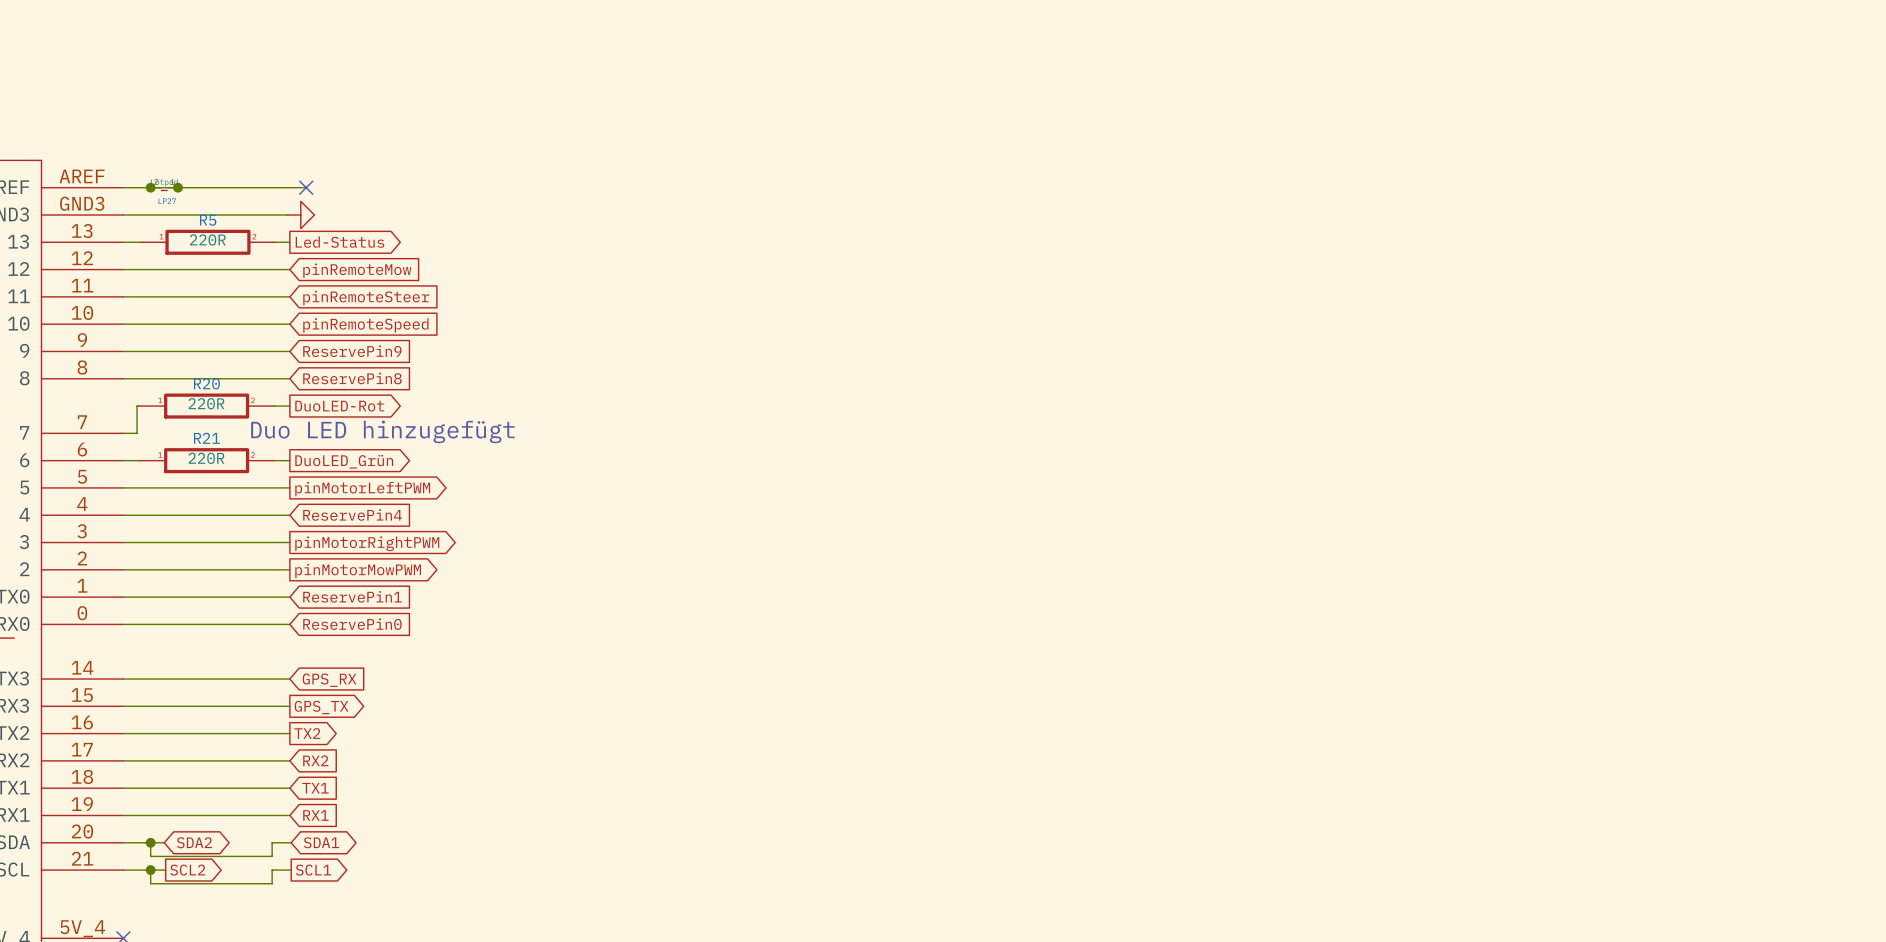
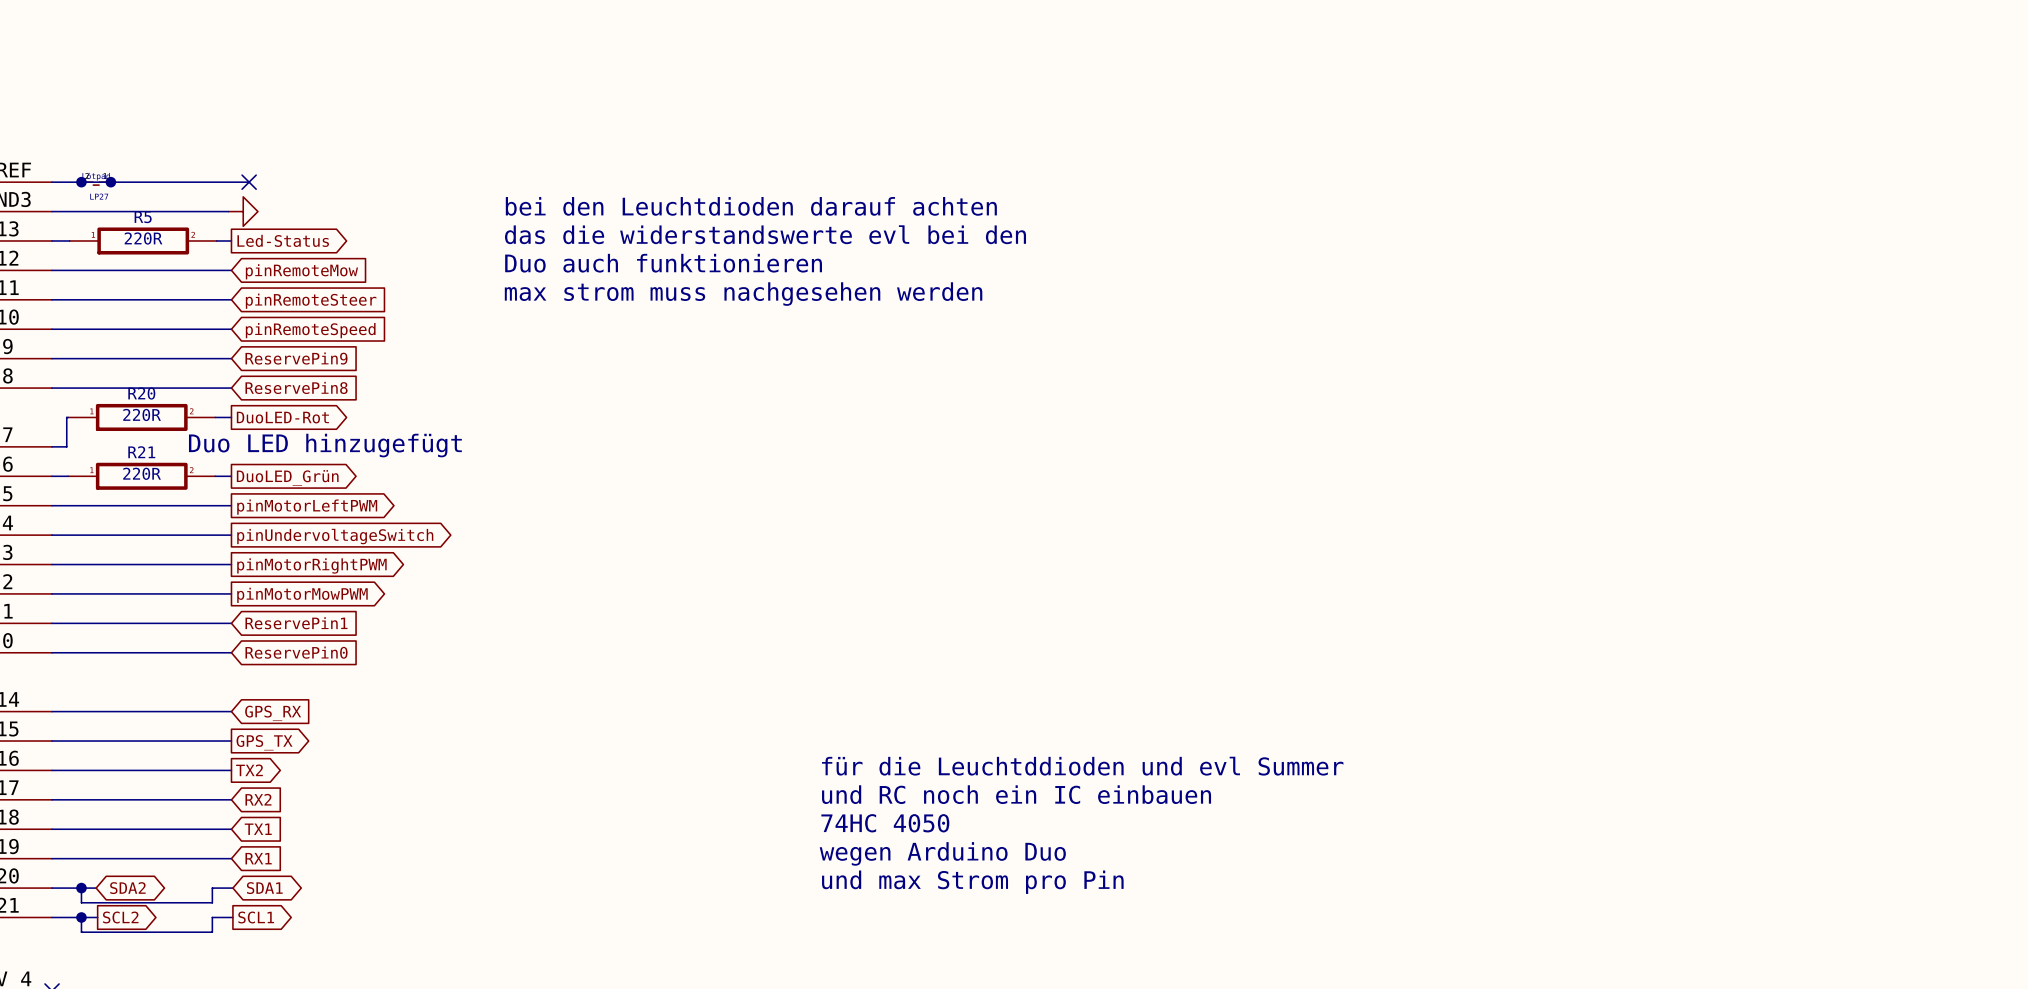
text: none -> bei den Leuchtdioden darauf achten (751, 206)
text: none -> das die widerstandswerte evl bei den (765, 234)
text: none -> Duo auch funktionieren (663, 263)
text: none -> max strom muss nachgesehen werden (743, 294)
global label shape: input (352, 514) -> output (335, 536)
global label: ReservePin4 (352, 514) -> pinUndervoltageSwitch (335, 536)
text: none -> für die Leuchtddioden und evl Summer (1082, 766)
text: none -> und RC noch ein IC einbauen (1016, 794)
text: none -> 74HC 4050 (885, 823)
text: none -> wegen Arduino Duo (942, 853)
text: none -> und max Strom pro Pin (972, 882)

